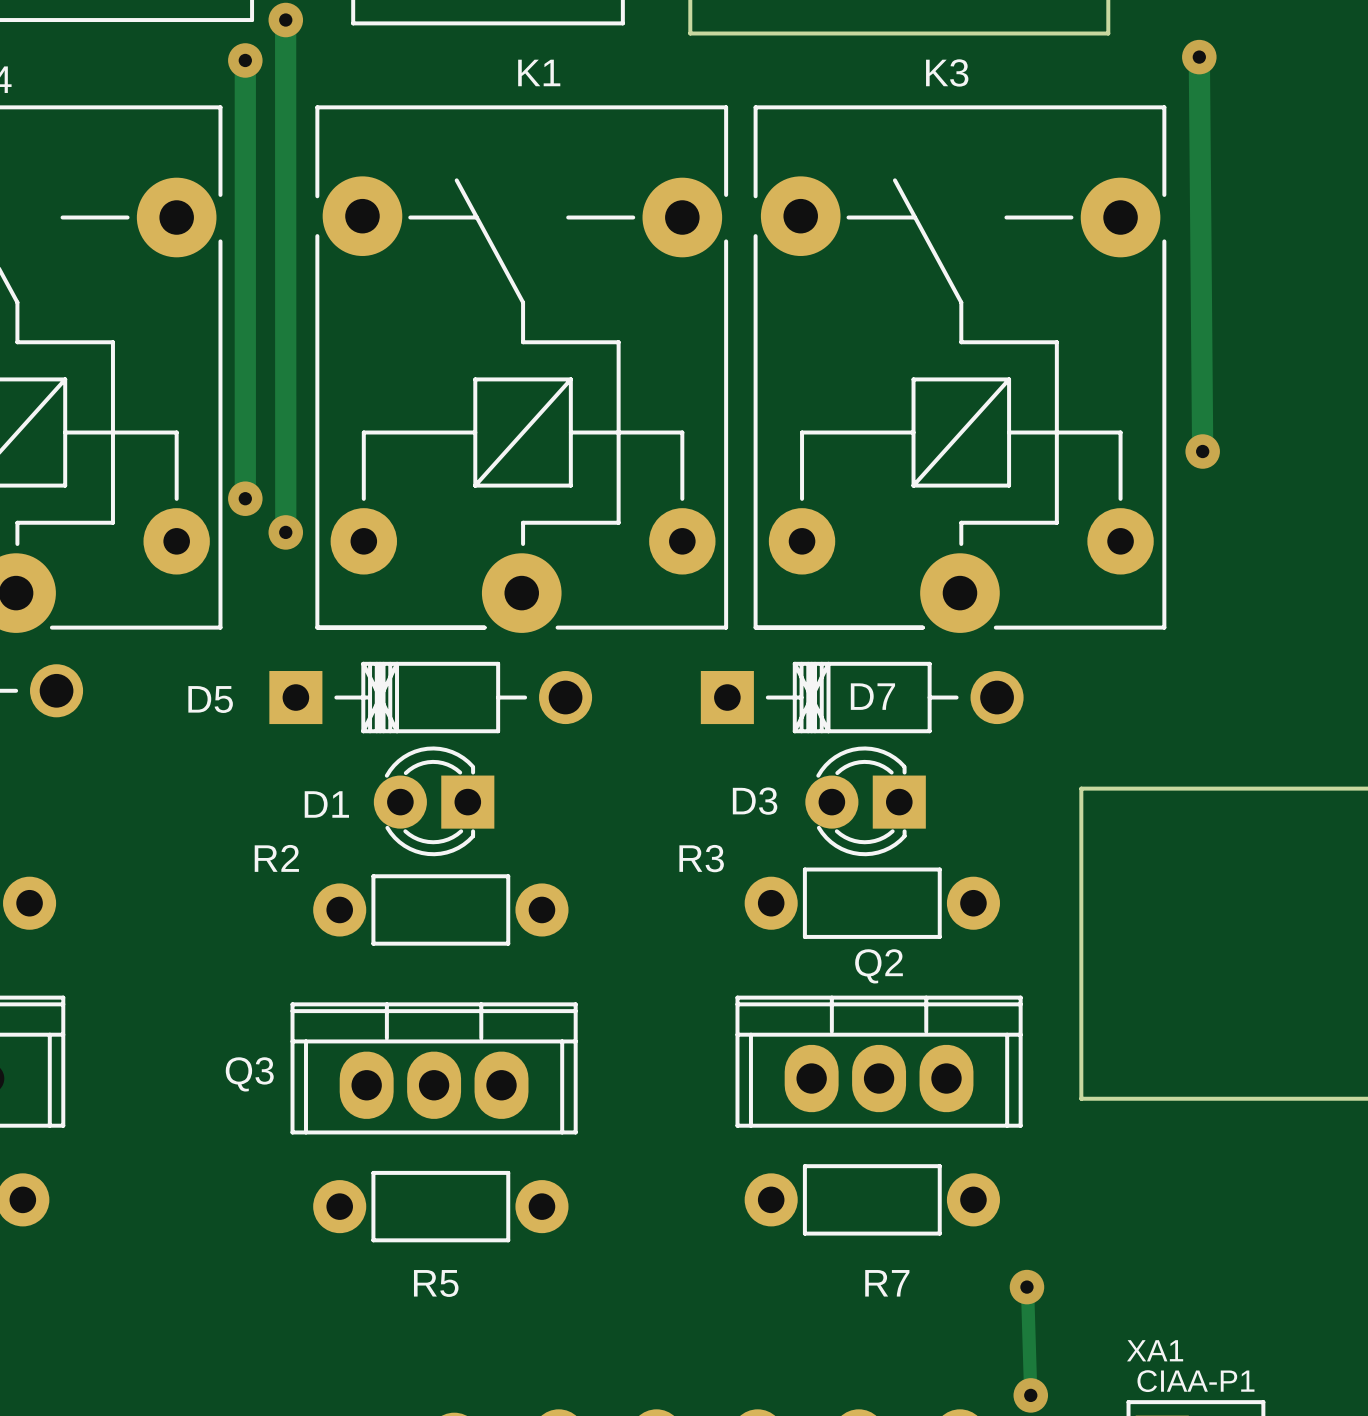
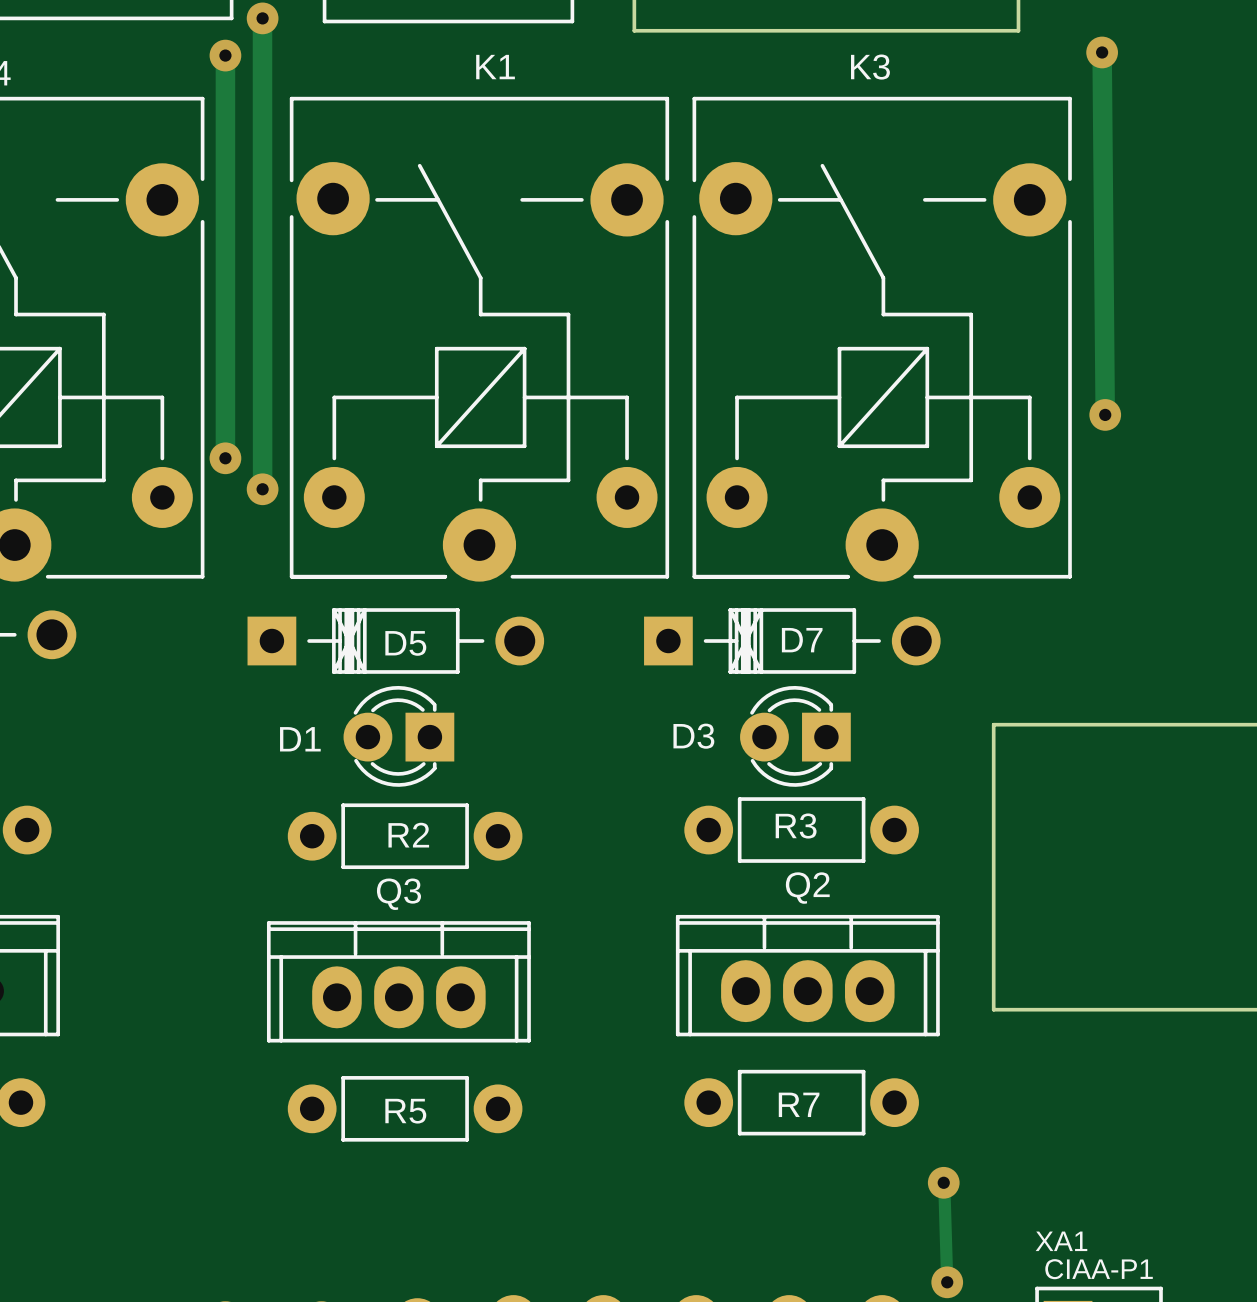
D5 name position: D5 (210, 699) -> D5 (405, 643)
R2 name position: R2 (276, 858) -> R2 (408, 835)
R3 name position: R3 (701, 858) -> R3 (796, 826)
Q3 name position: Q3 (249, 1074) -> Q3 (398, 894)
R5 name position: R5 (436, 1283) -> R5 (405, 1111)
R7 name position: R7 (887, 1283) -> R7 (799, 1104)

